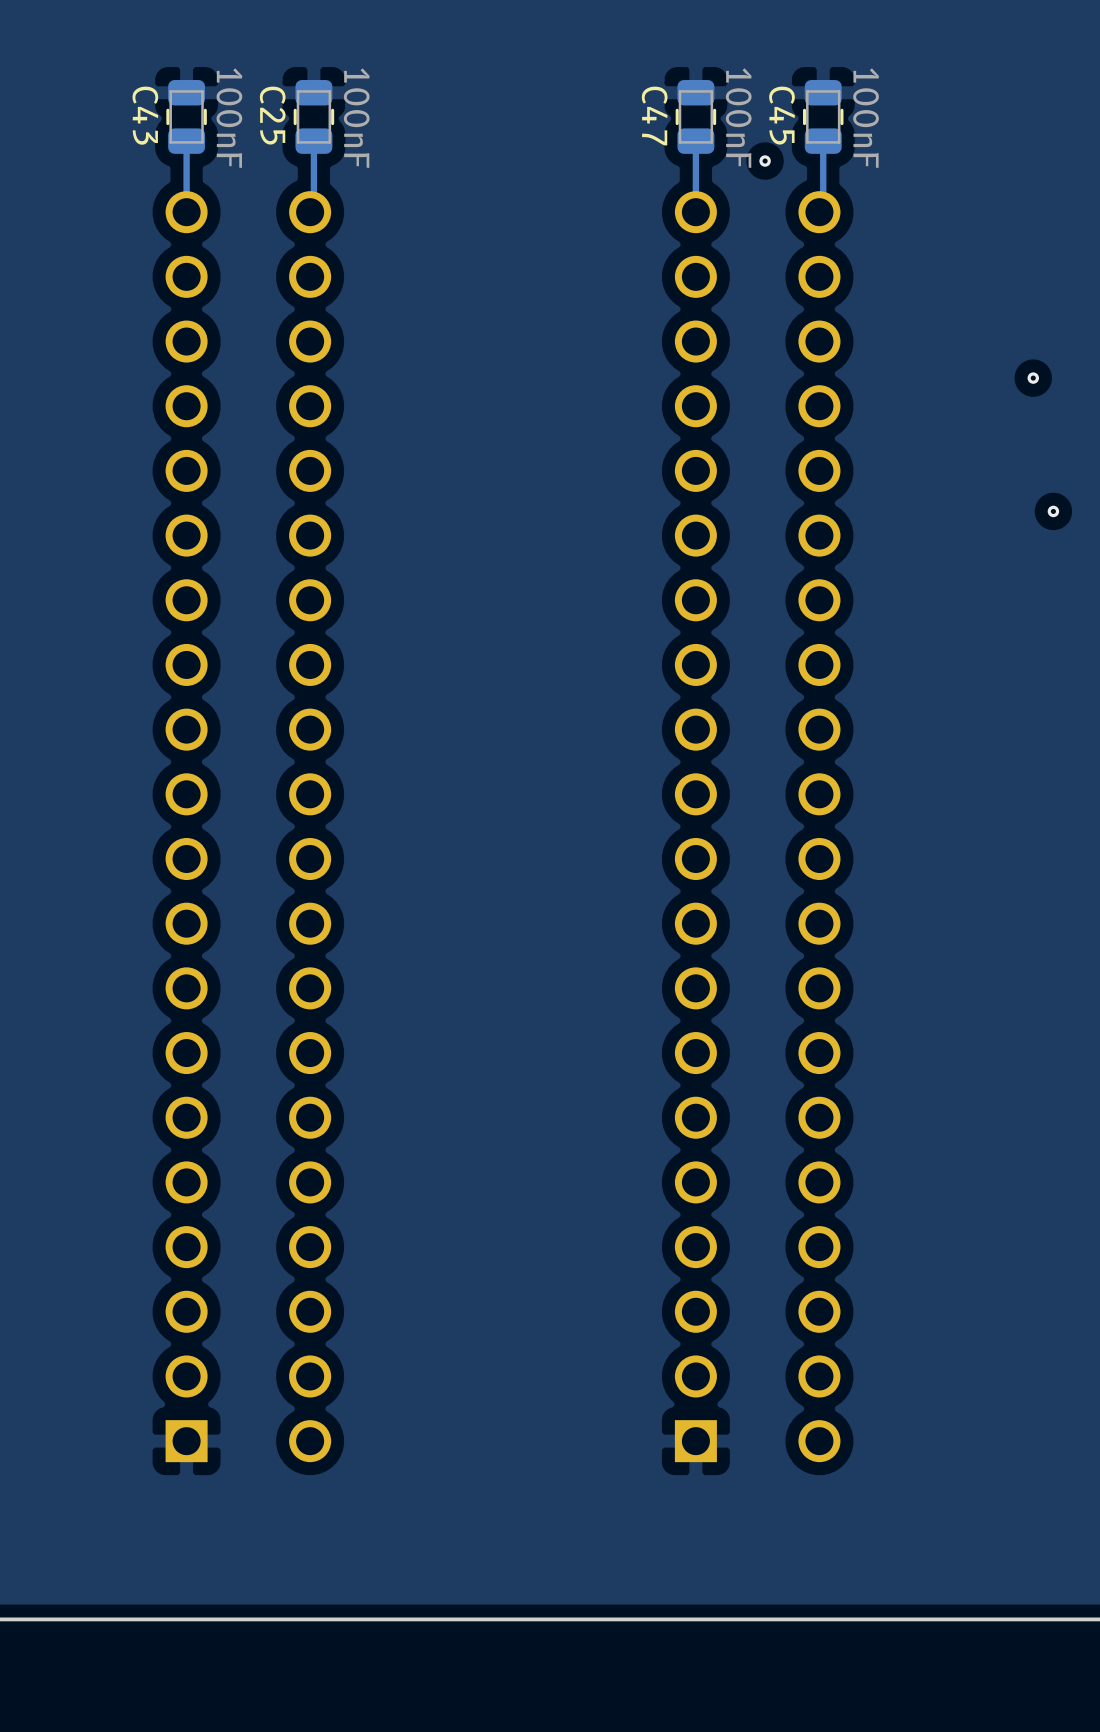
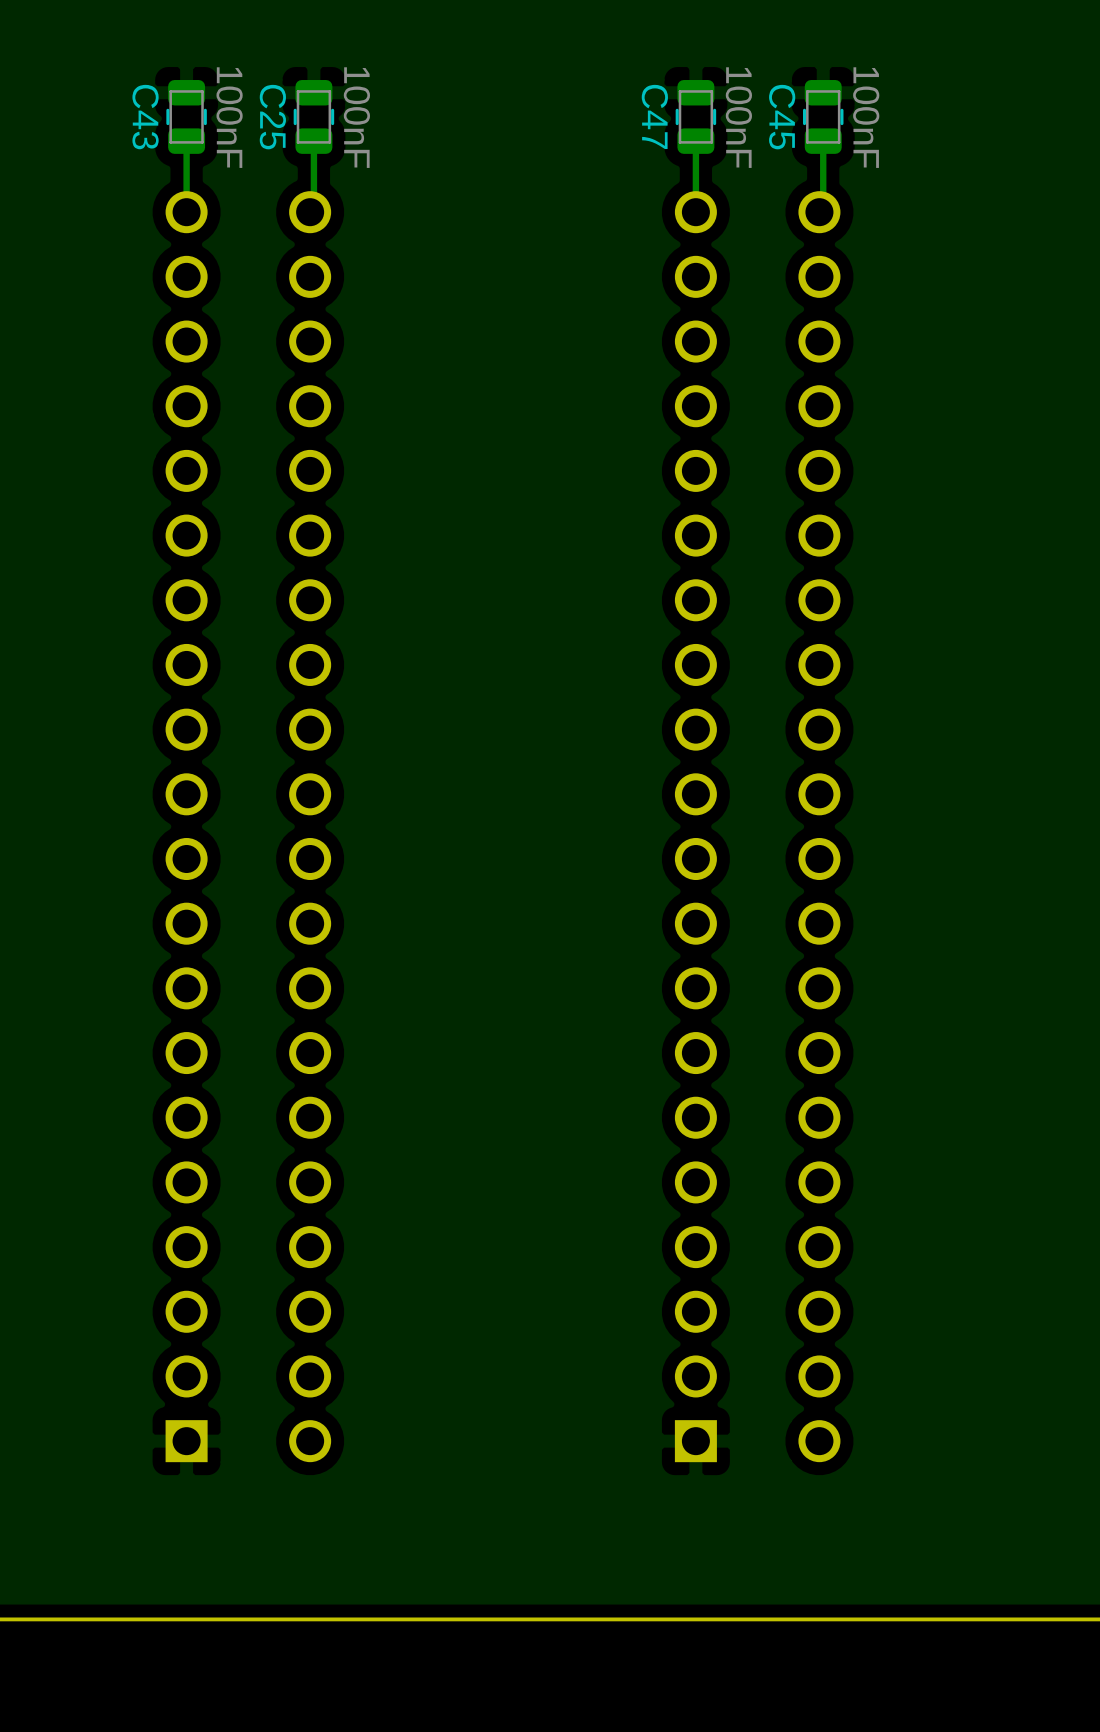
via: (765, 161) -> none
via: (1033, 378) -> none
via: (1053, 511) -> none

